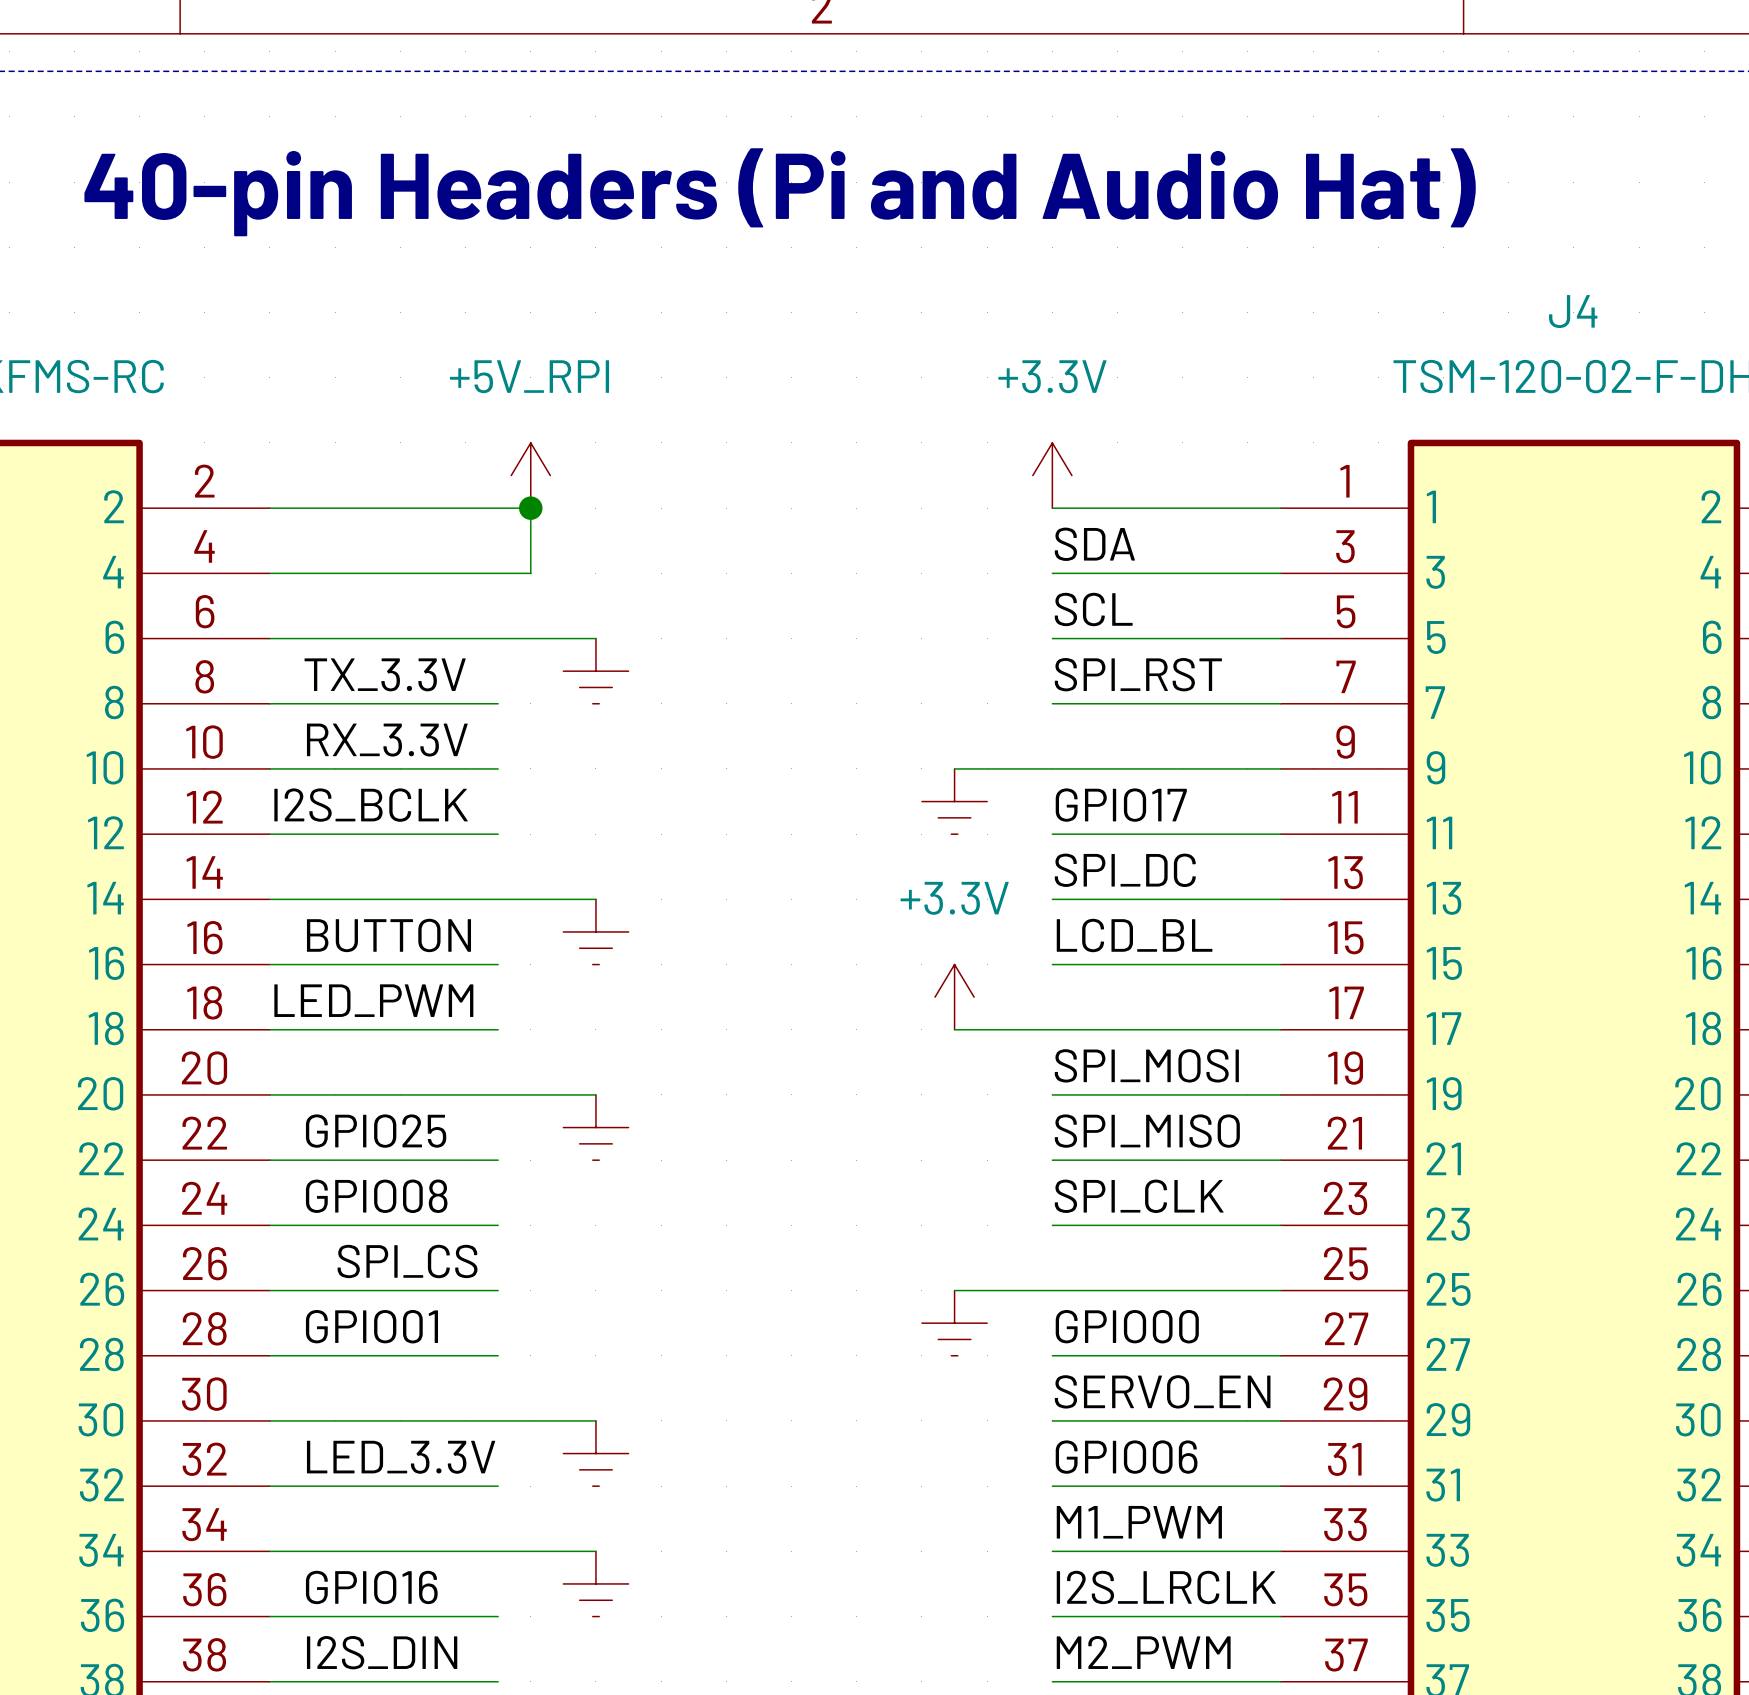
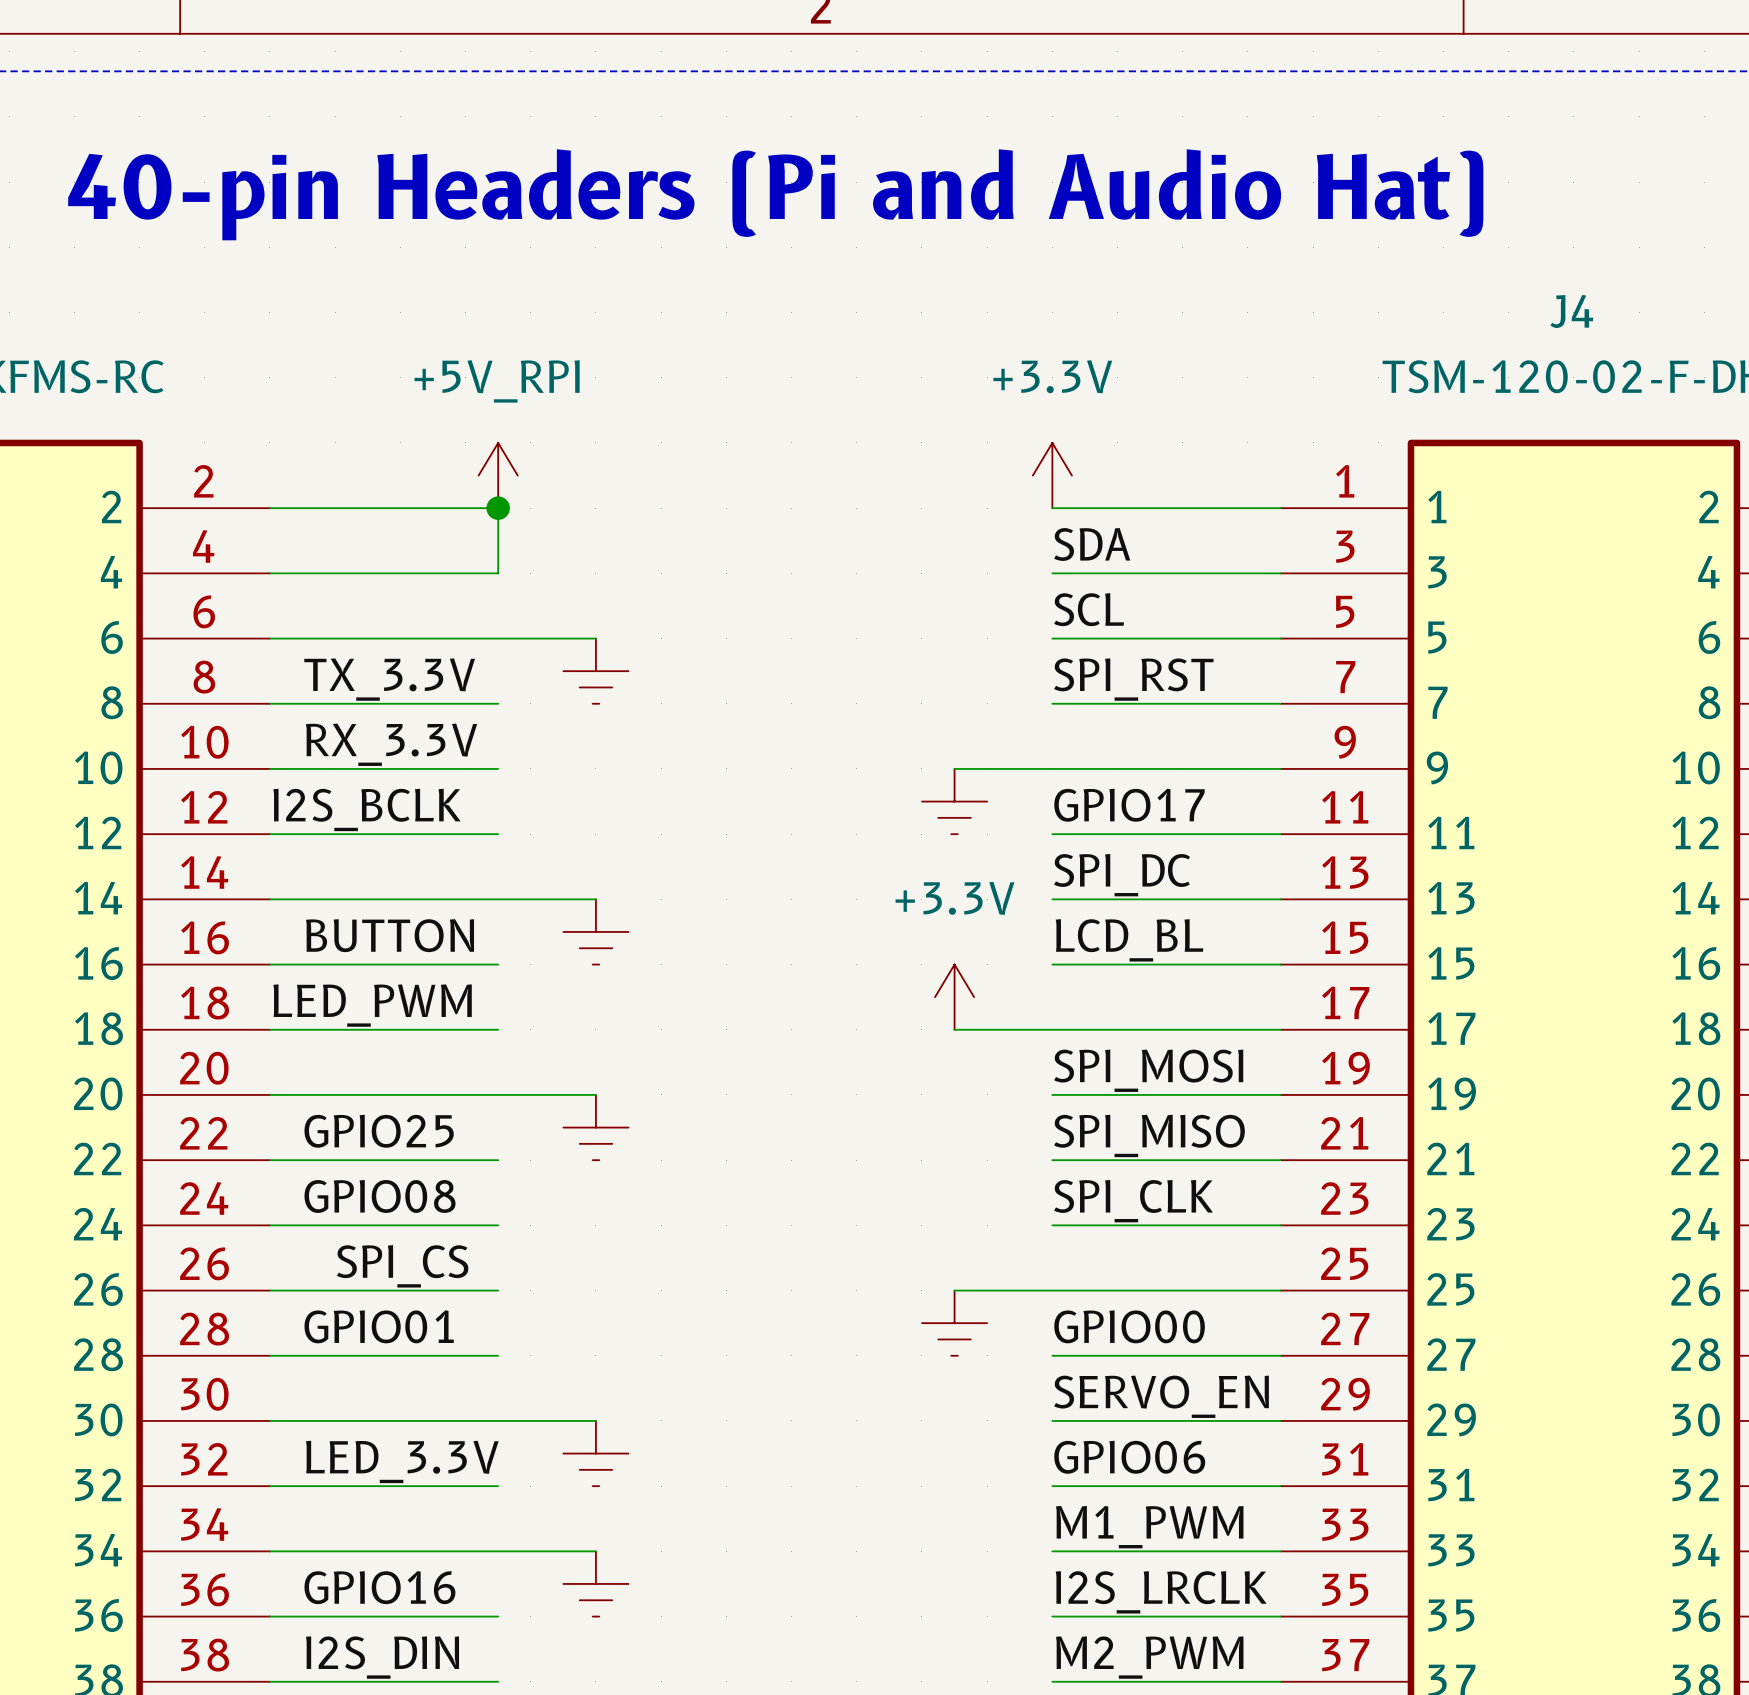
power symbol position: +5V_RPI (530, 475) -> +5V_RPI (498, 475)
wire: (498, 508) (530, 508) (530, 573) (498, 573) -> (498, 508) (498, 573)
junction position: (530, 508) -> (498, 508)

